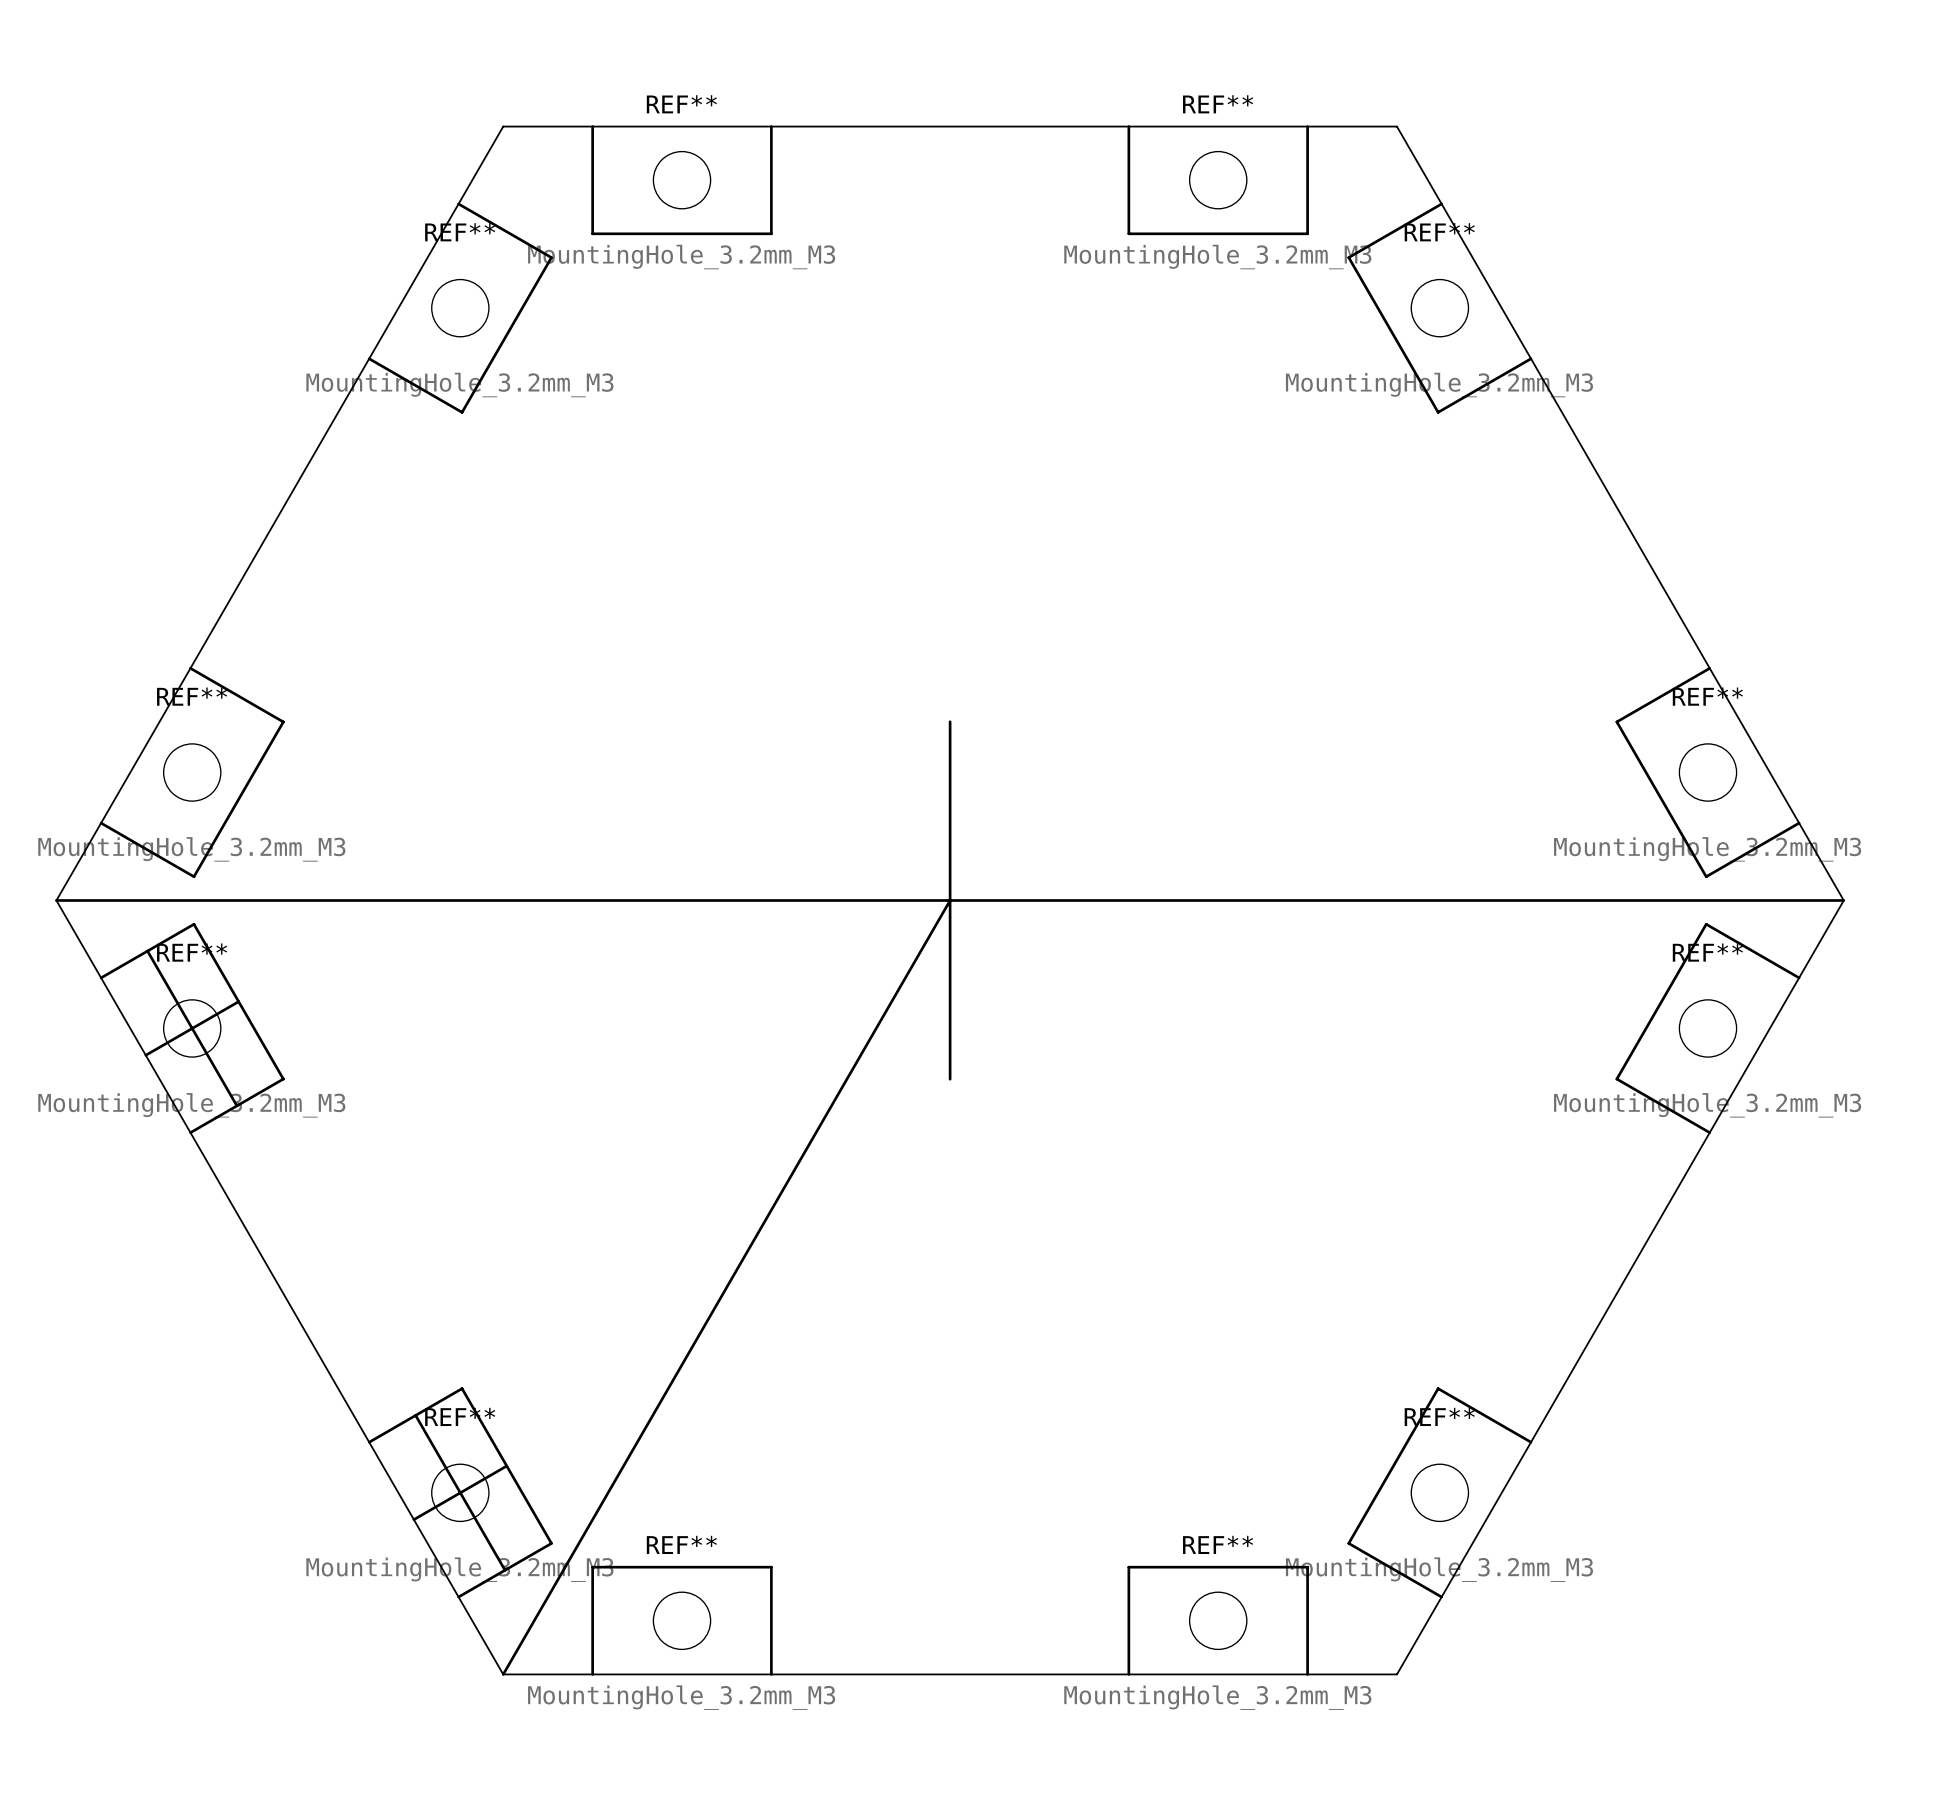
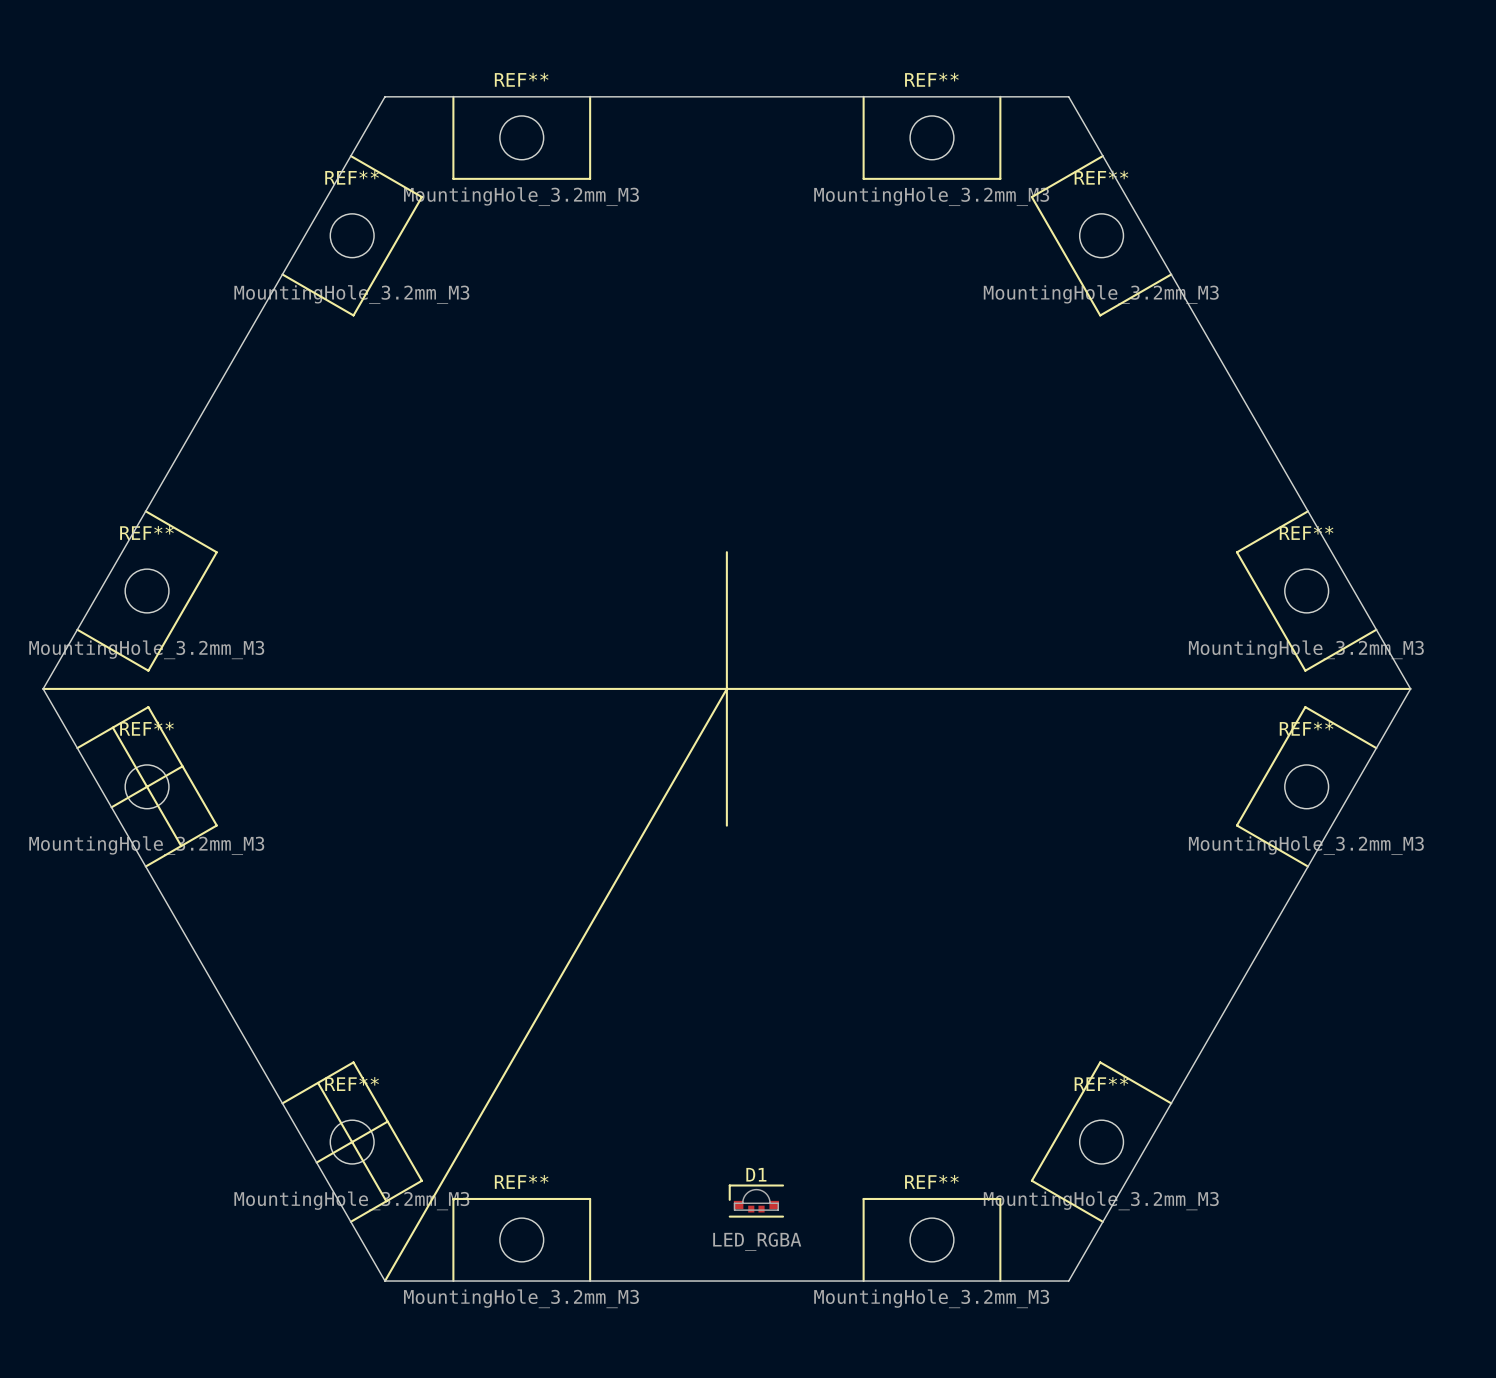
D1: none -> LED_RGBA (756, 1201)

